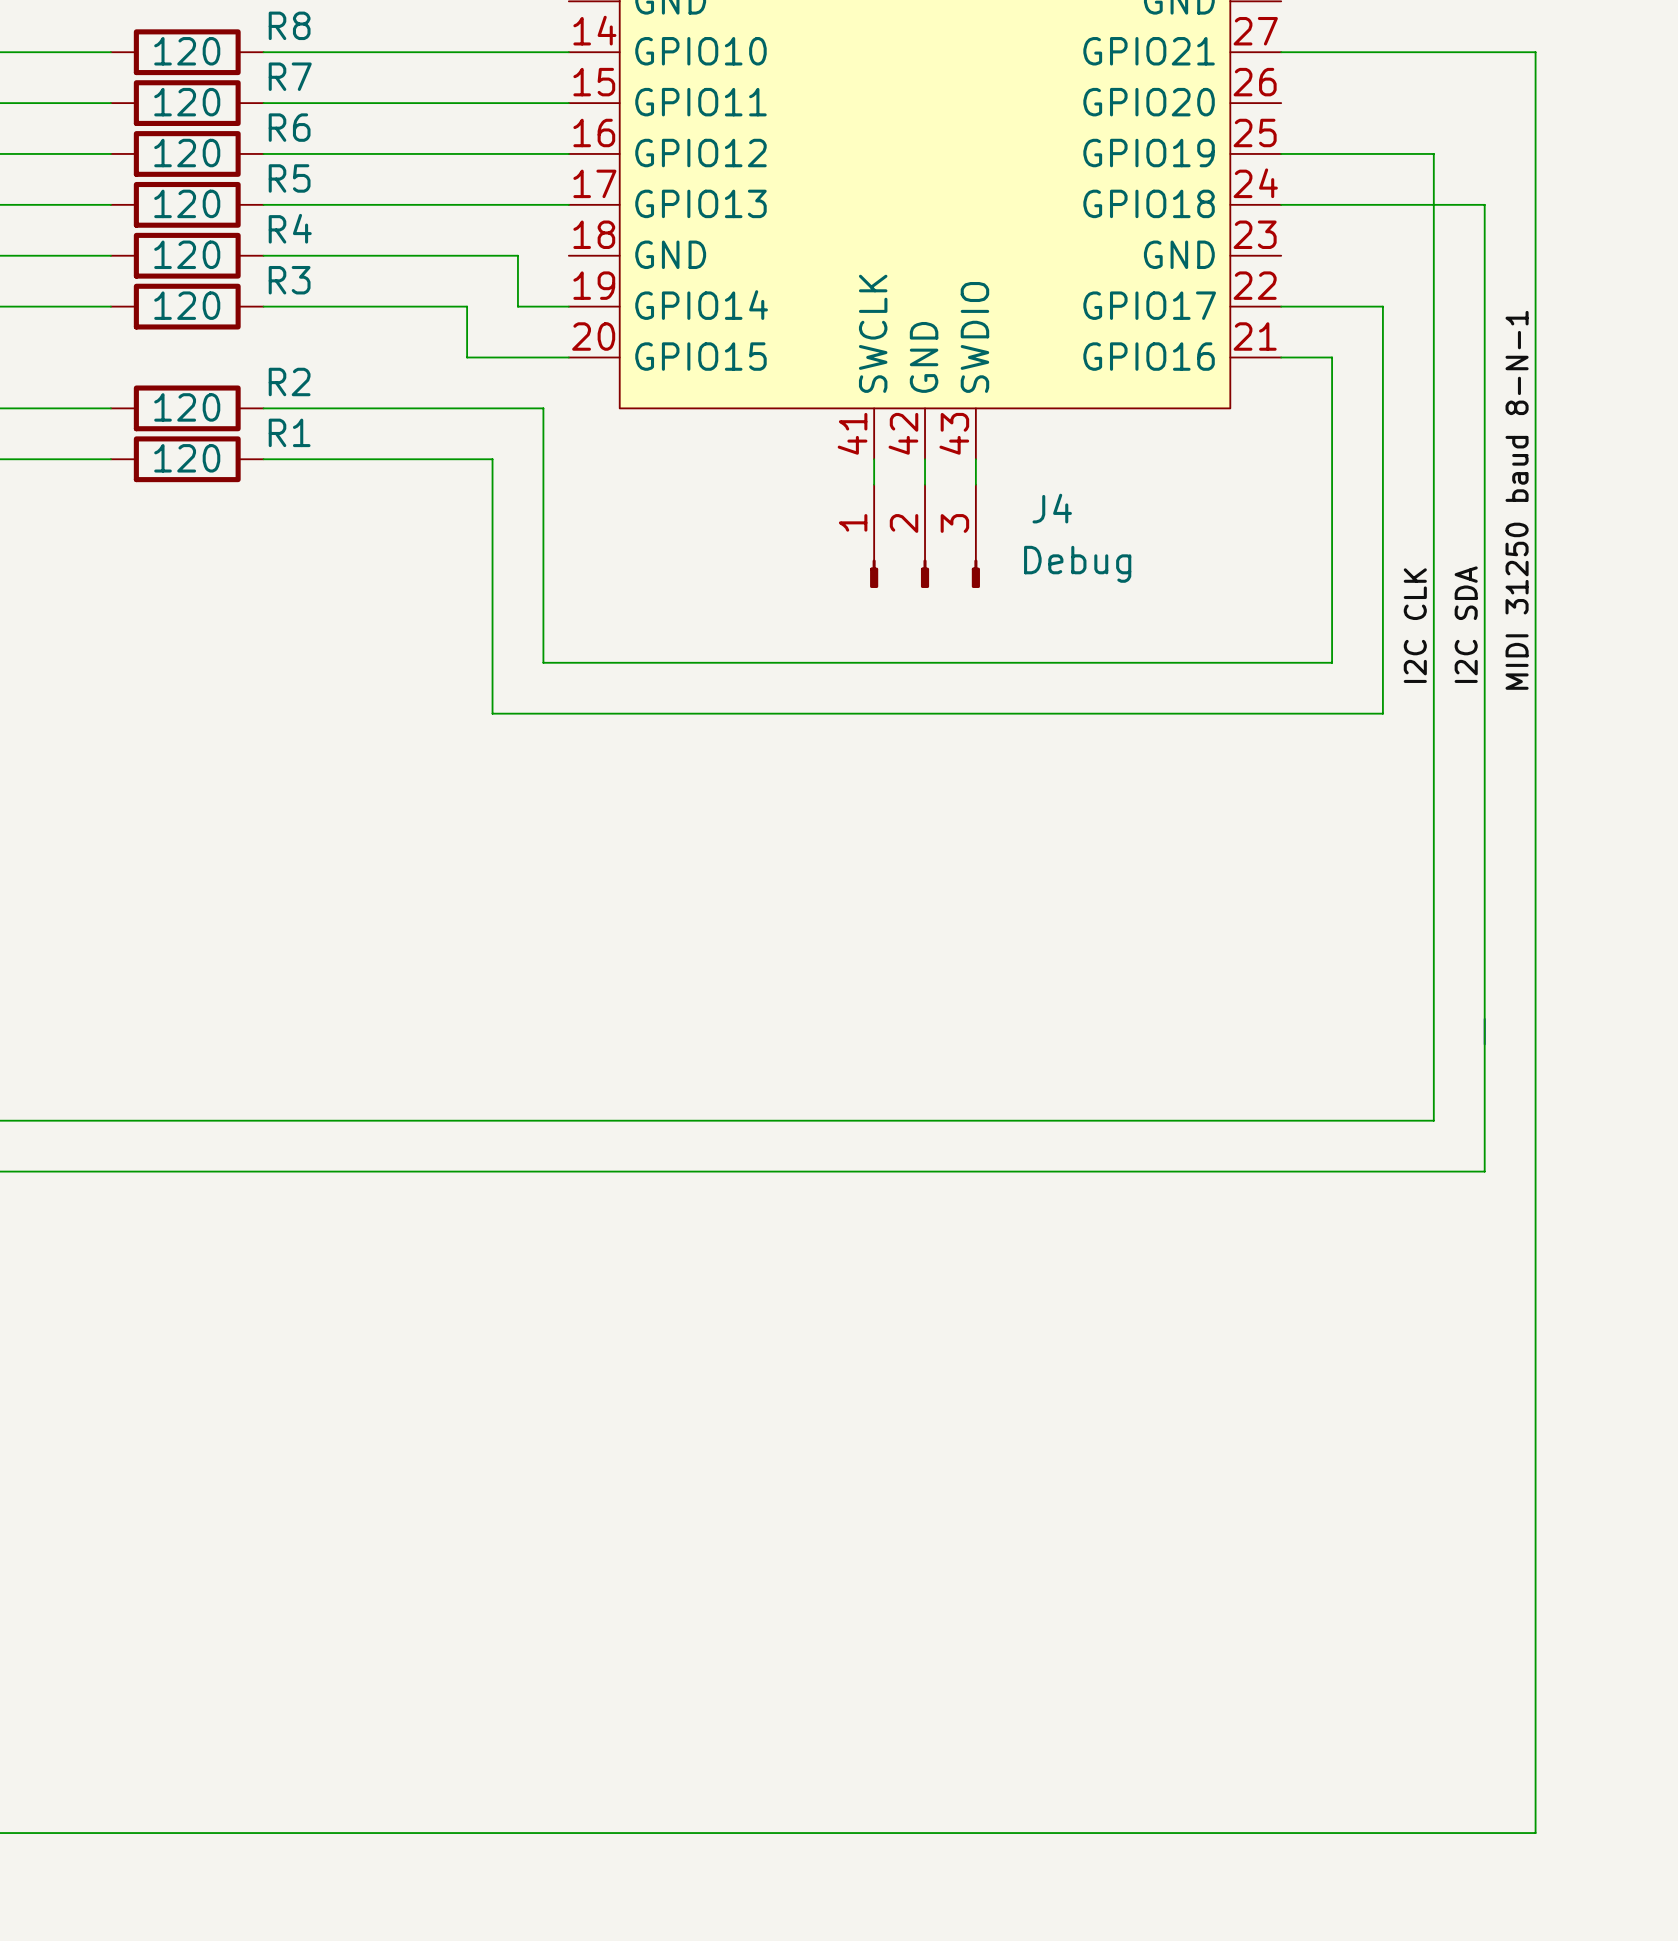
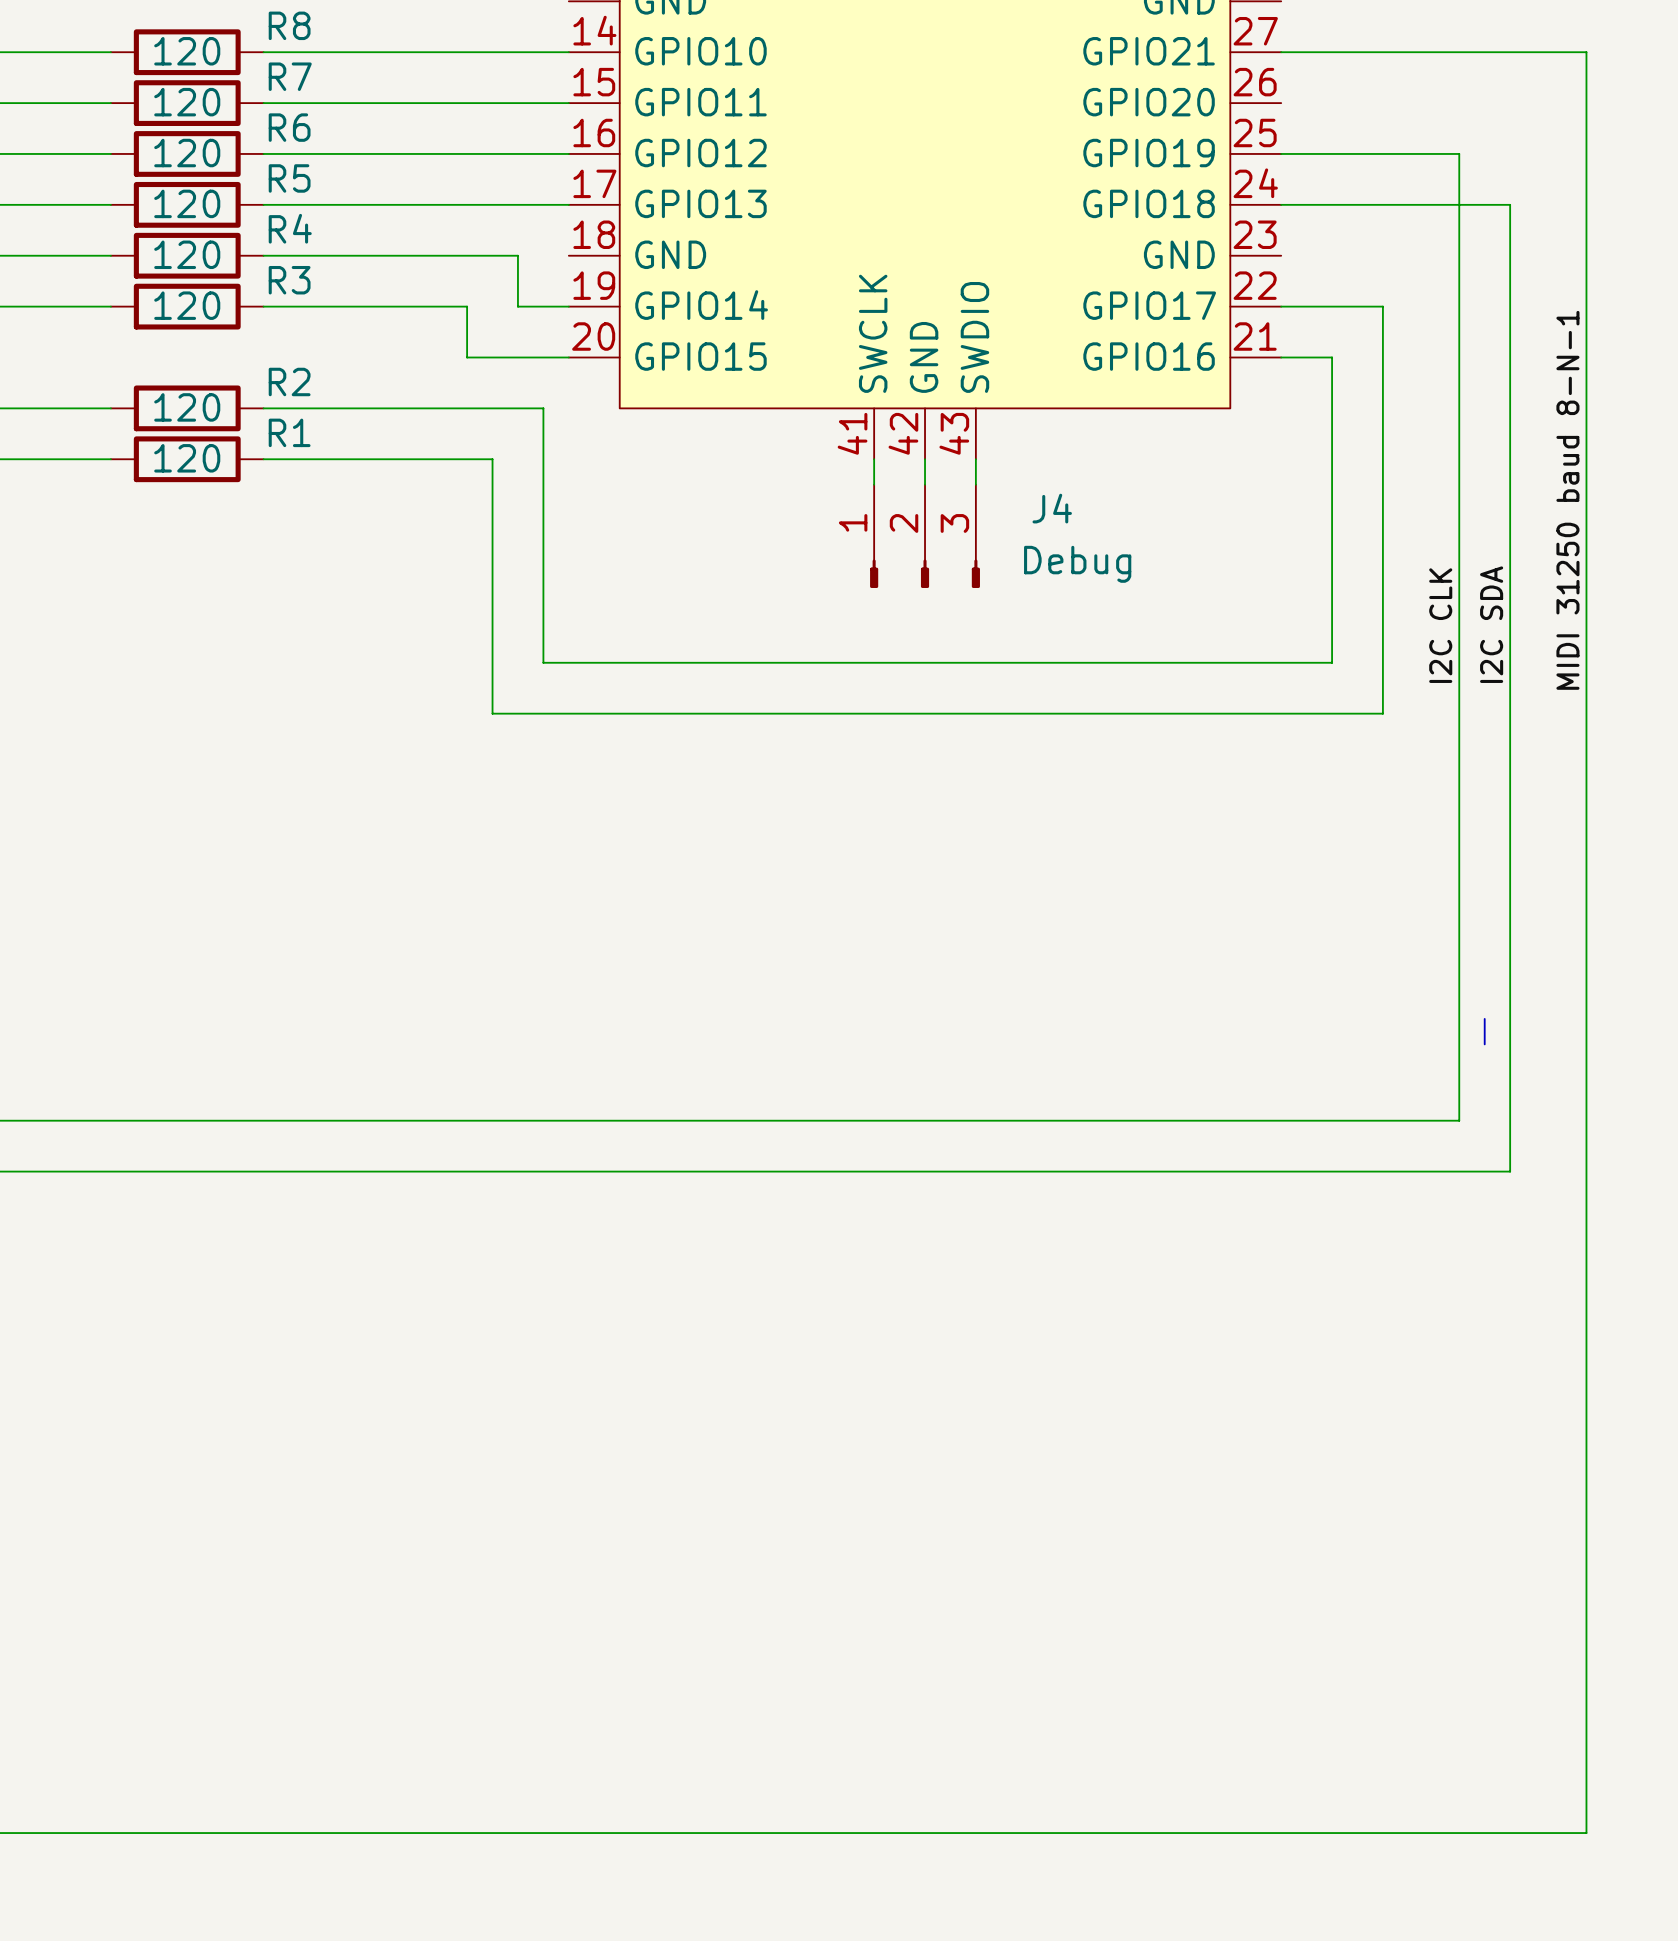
wire: (1535, 52) (1535, 1833) -> (1535, 52) (1586, 52) (1586, 1833) (1535, 1833)
wire: (1433, 153) (1433, 1120) -> (1433, 153) (1459, 153) (1459, 1120) (1433, 1120)
wire: (1484, 204) (1484, 1171) -> (1484, 204) (1510, 204) (1510, 1171) (1484, 1171)
label position: MIDI 31250 baud 8-N-1 (1517, 500) -> MIDI 31250 baud 8-N-1 (1567, 500)
label position: I2C SDA (1466, 624) -> I2C SDA (1491, 624)
label position: I2C CLK (1415, 625) -> I2C CLK (1440, 625)

